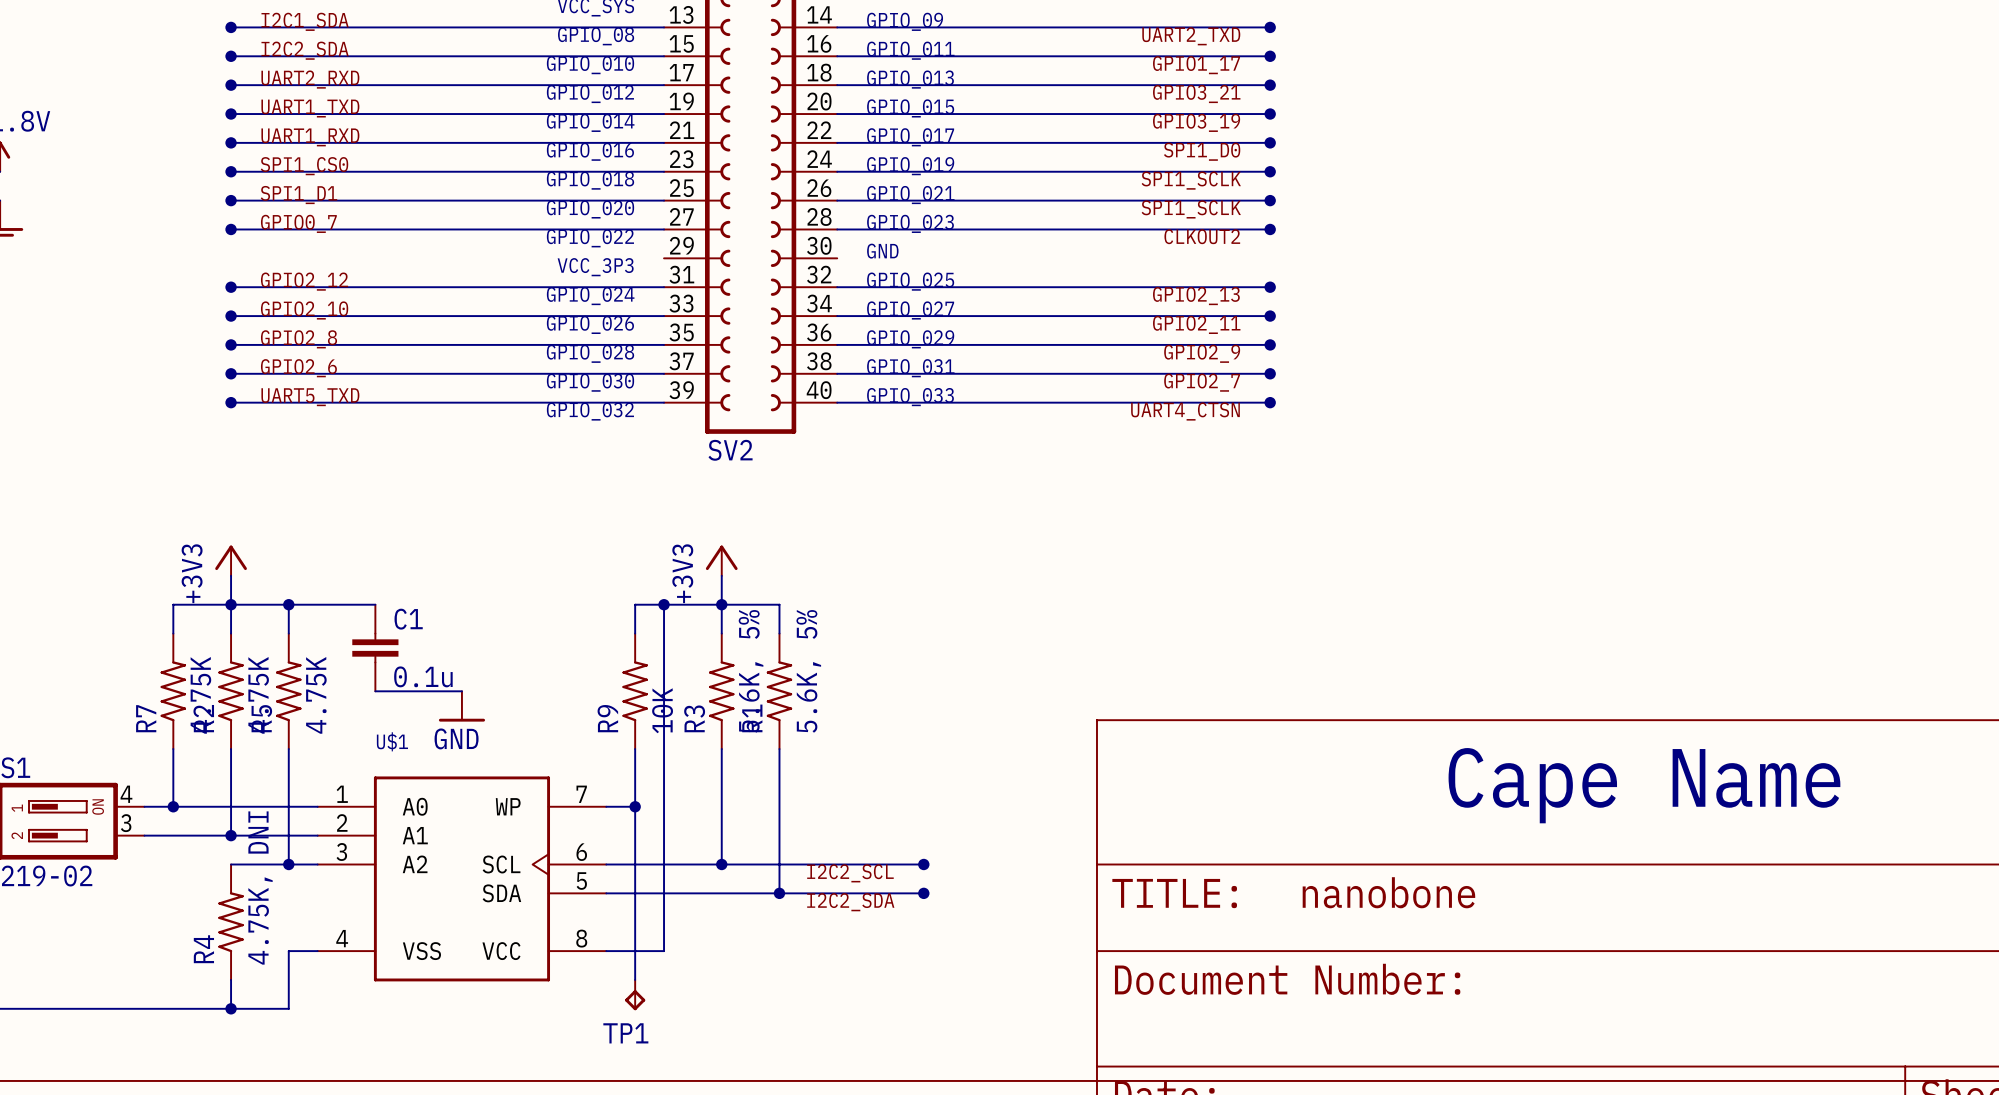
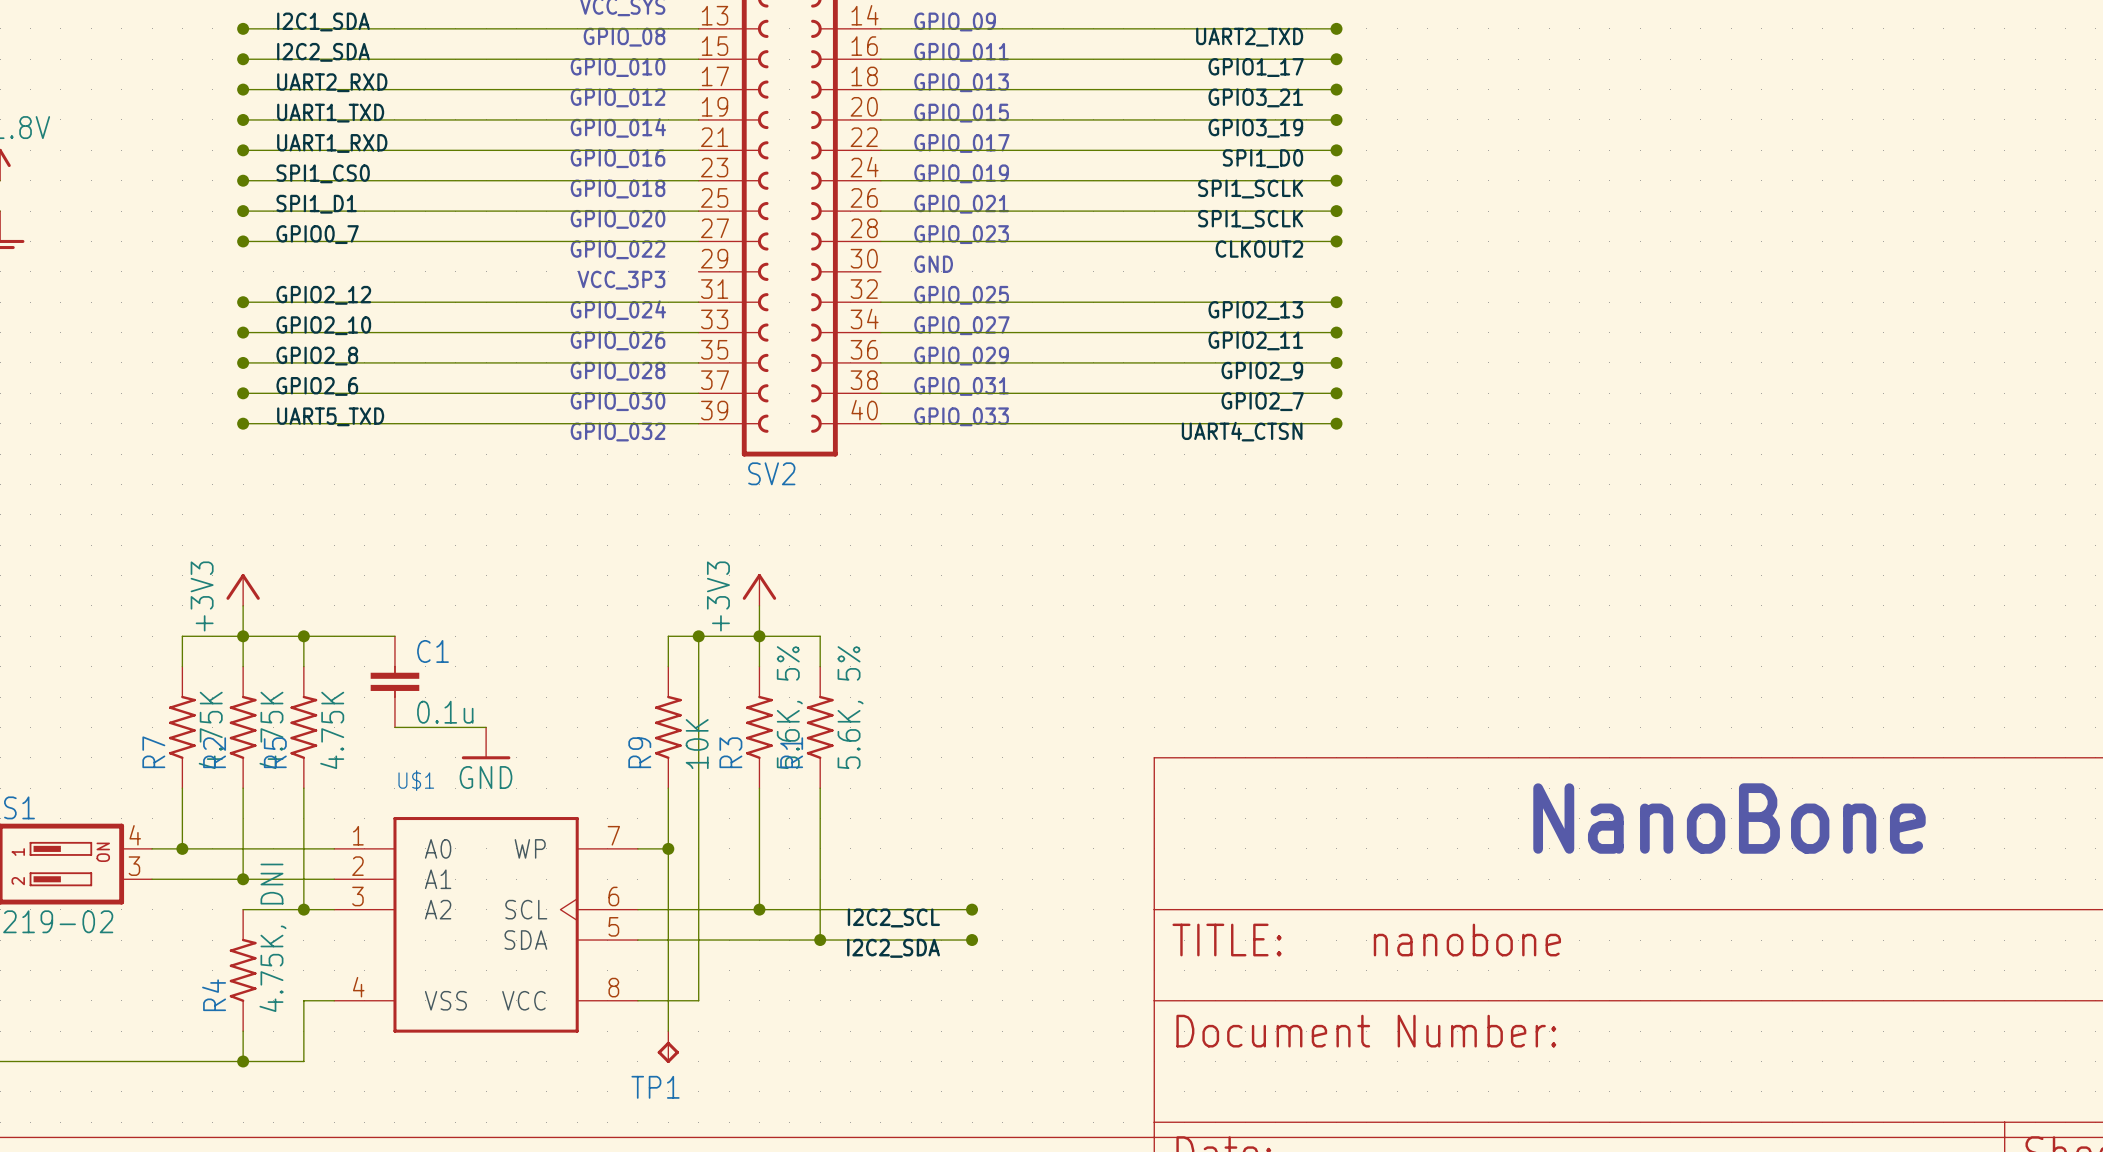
text: Cape Name (1644, 785) -> NanoBone (1729, 818)

